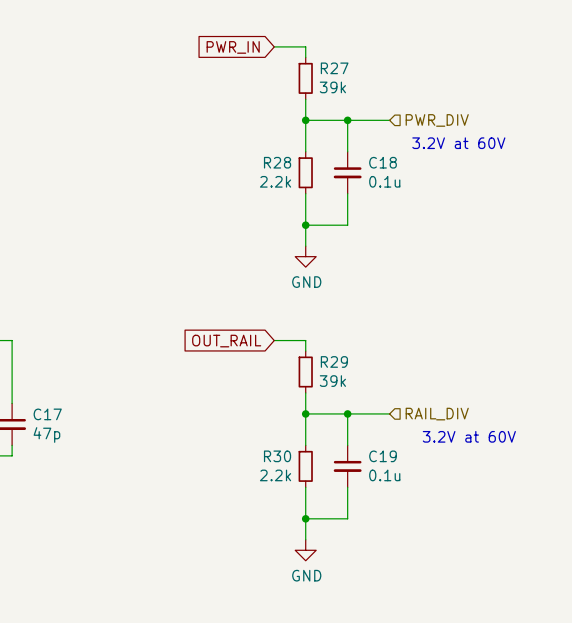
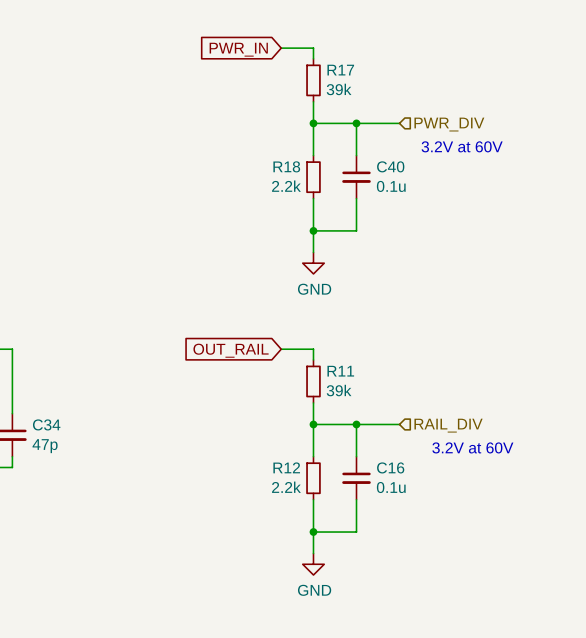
R27 name: R27 (334, 68) -> R17 (340, 70)
R28 name: R28 (277, 162) -> R18 (286, 166)
C18 name: C18 (383, 162) -> C40 (390, 166)
R29 name: R29 (334, 361) -> R11 (340, 371)
C17 name: C17 (47, 414) -> C34 (46, 424)
R30 name: R30 (277, 456) -> R12 (286, 467)
C19 name: C19 (383, 456) -> C16 (390, 467)

